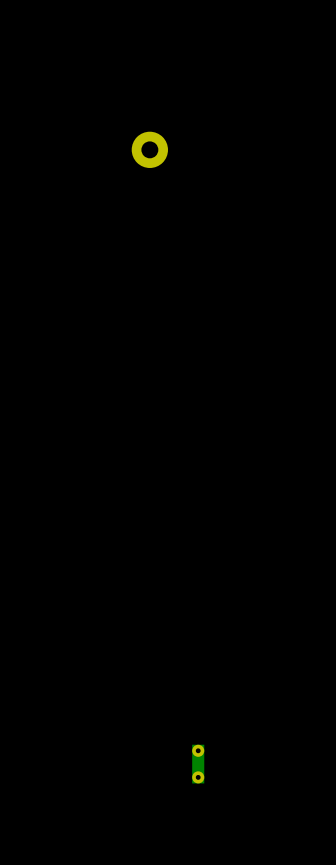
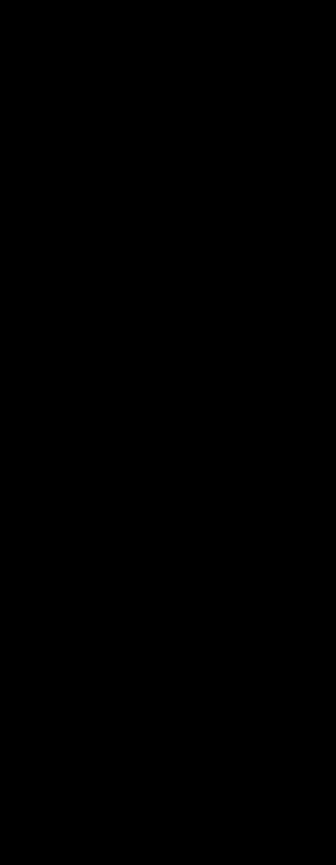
part: (149, 149) -> none
part: (198, 764) -> none

